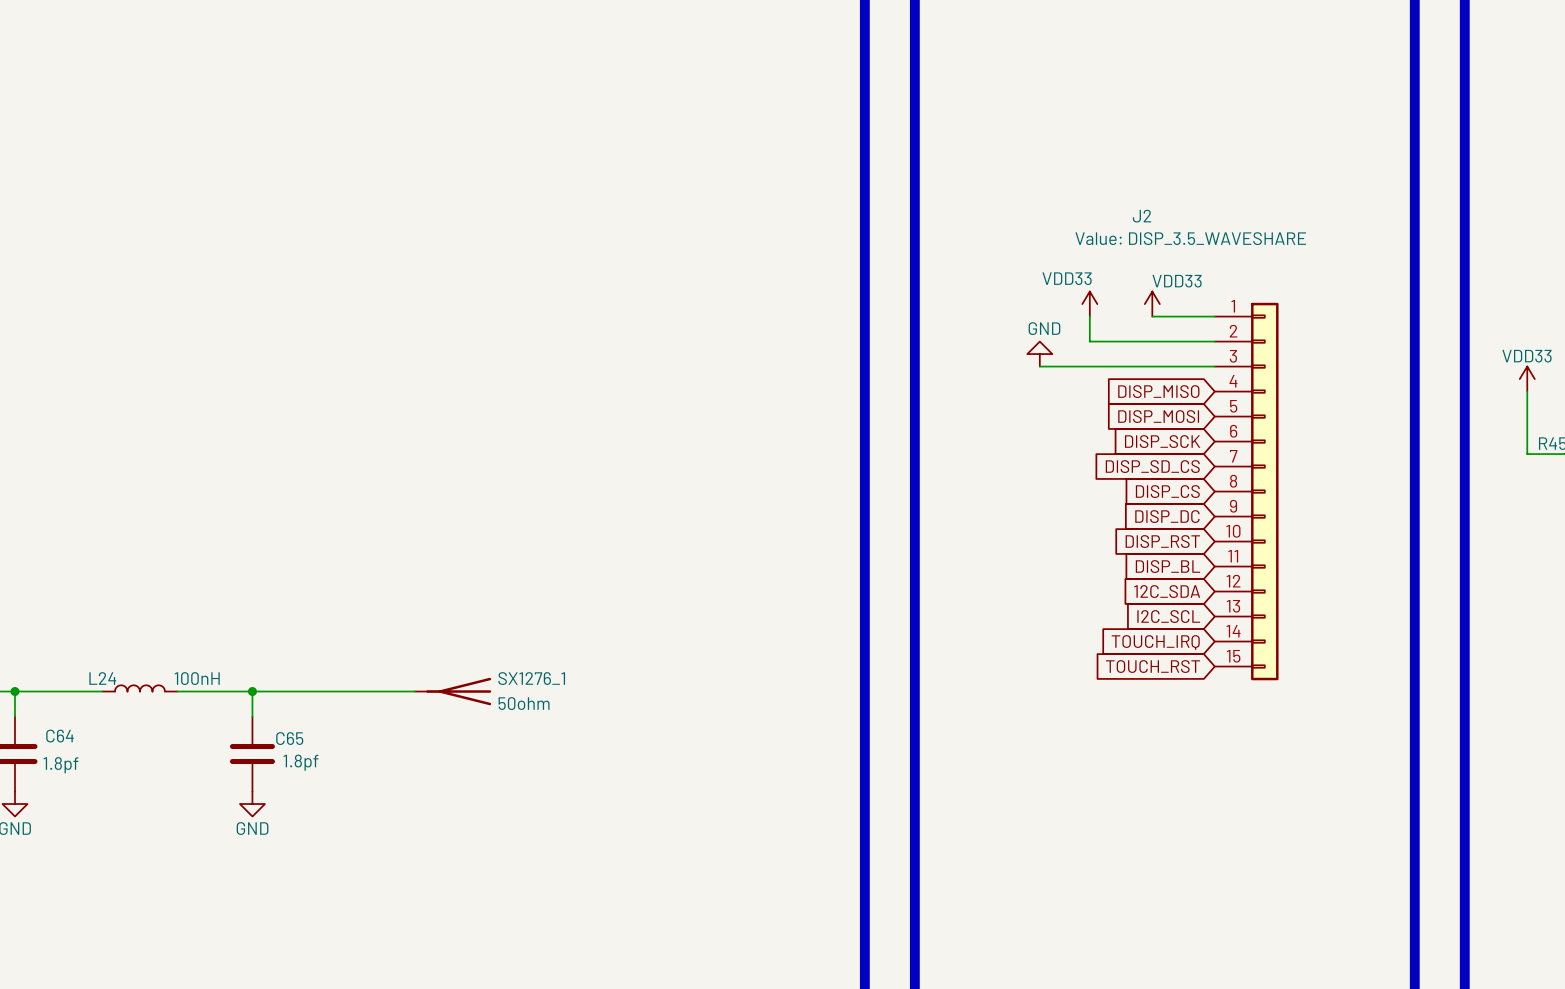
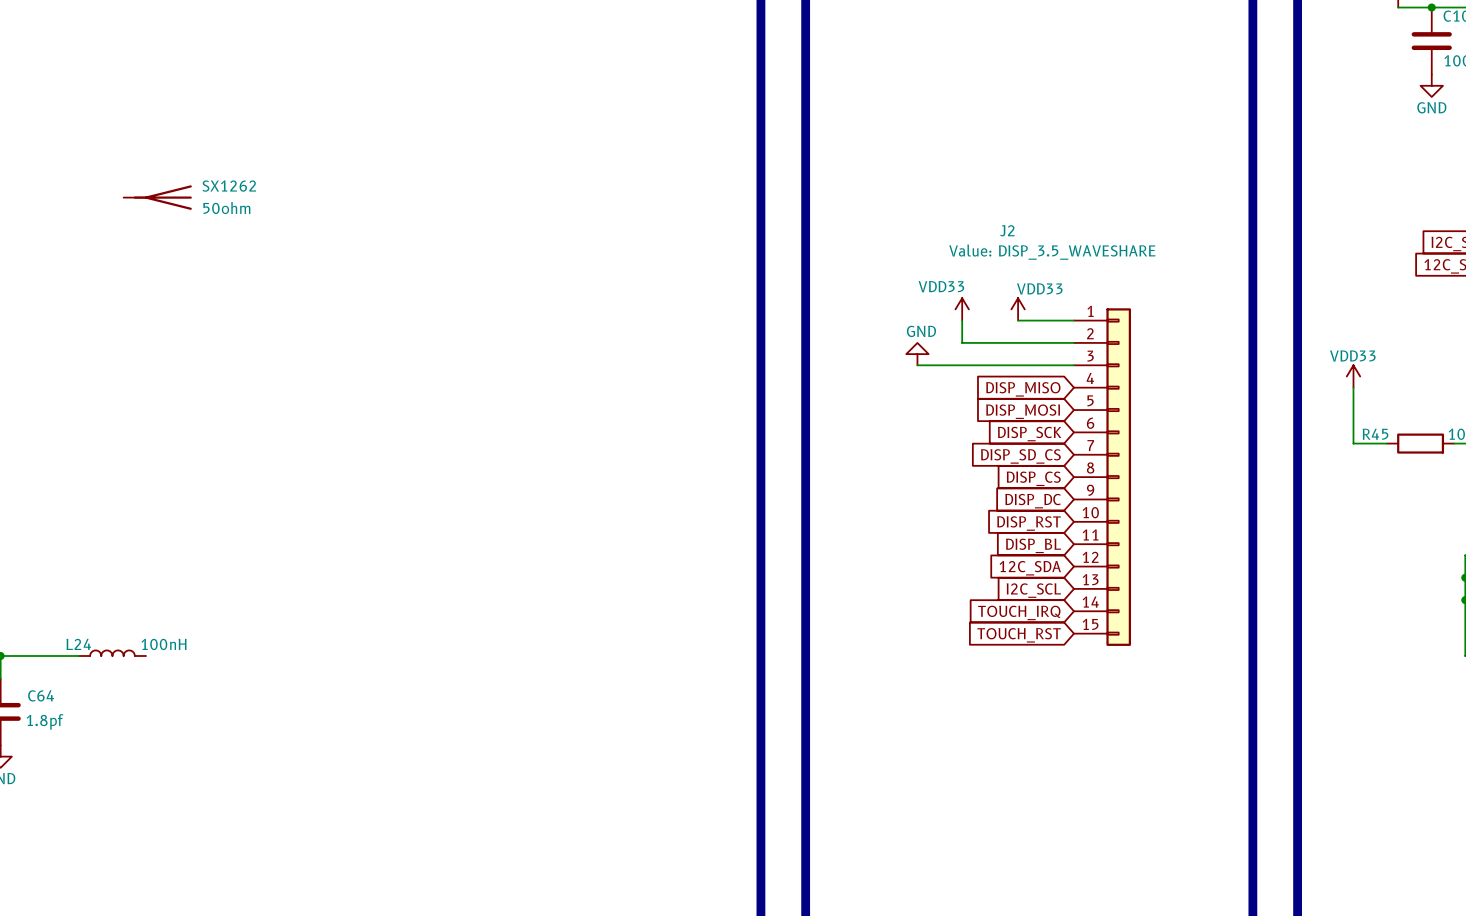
SX1262: none -> 50ohm (157, 197)
wire: (177, 691) (414, 691) -> none
wire: (252, 691) (252, 716) -> none
junction: (252, 691) -> none
SX1276_1: 50ohm (453, 691) -> none
C65: 1.8pf (252, 754) -> none
power symbol: GND (252, 804) -> none

